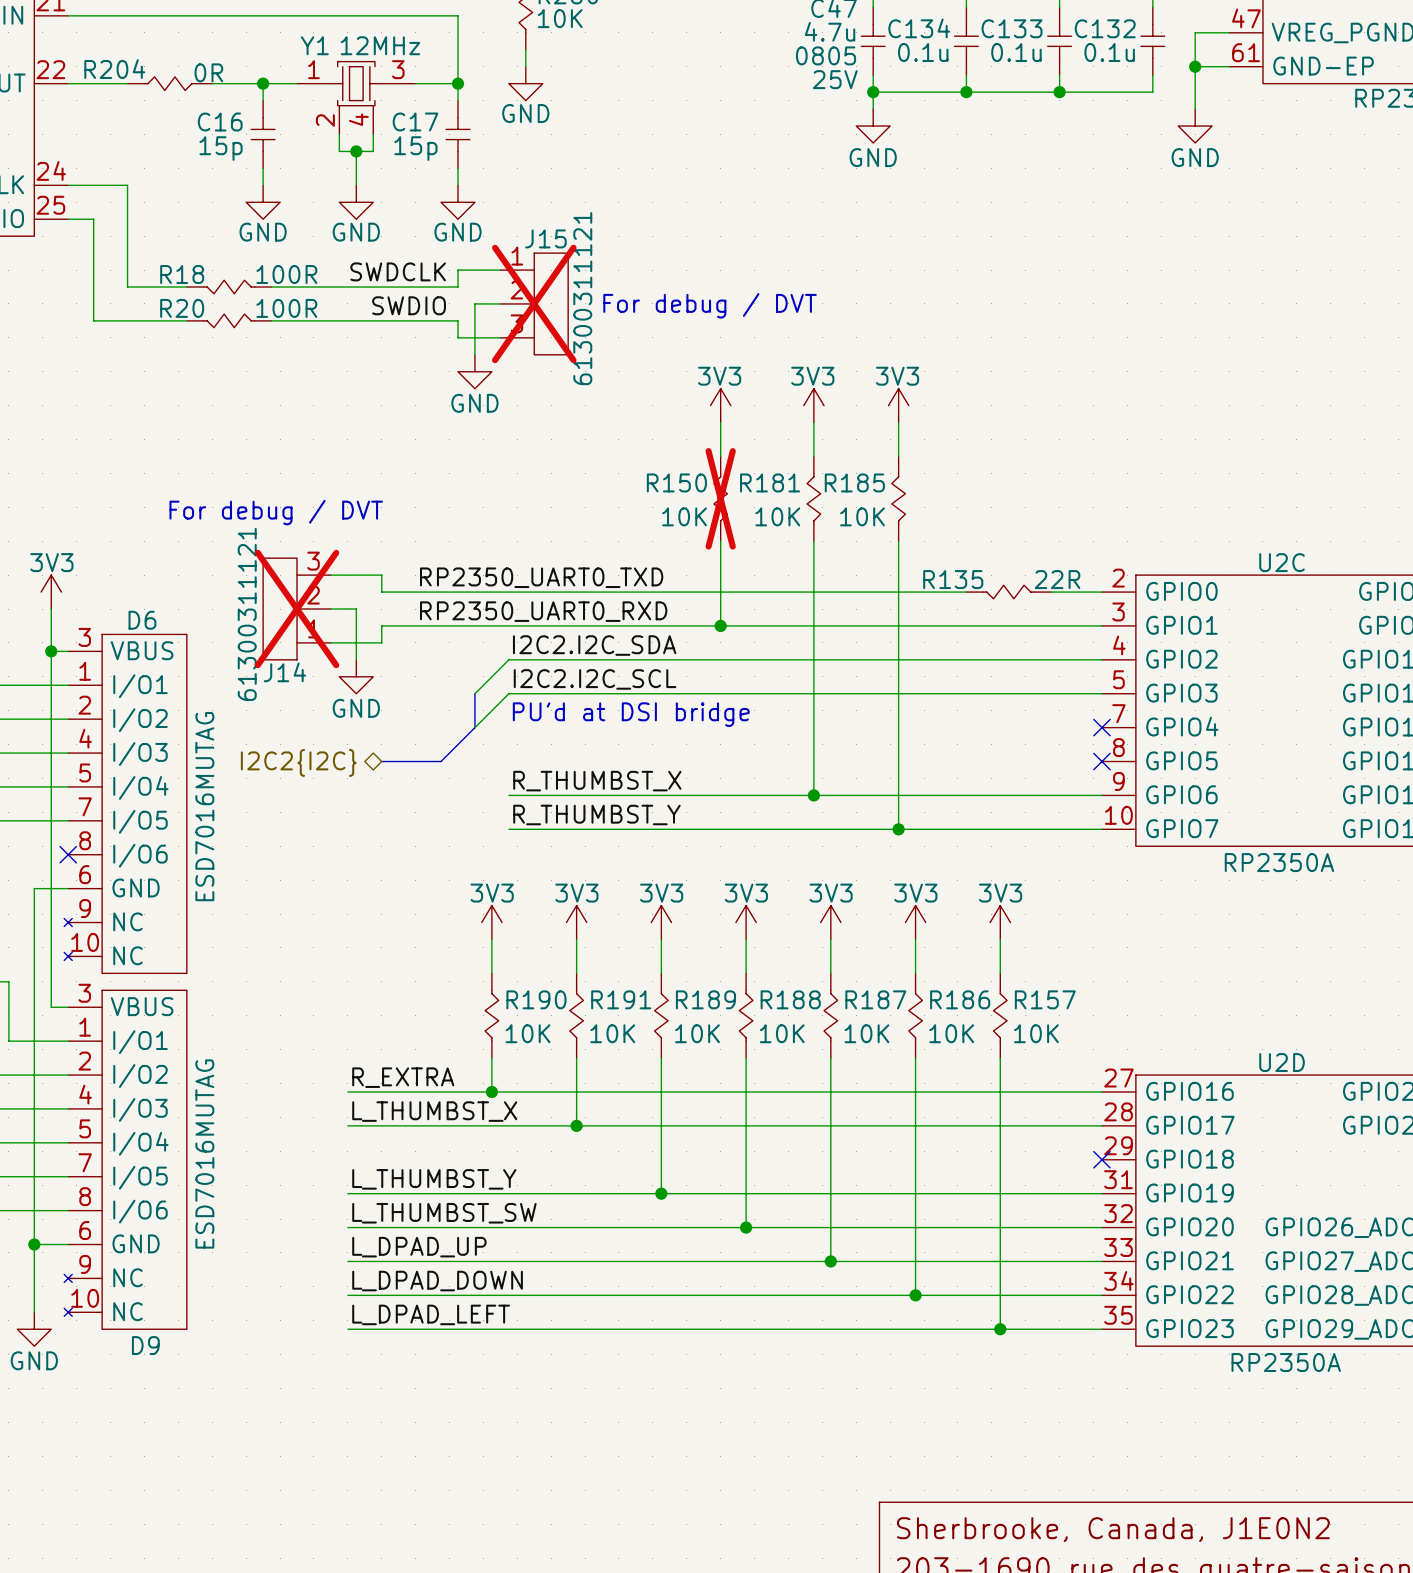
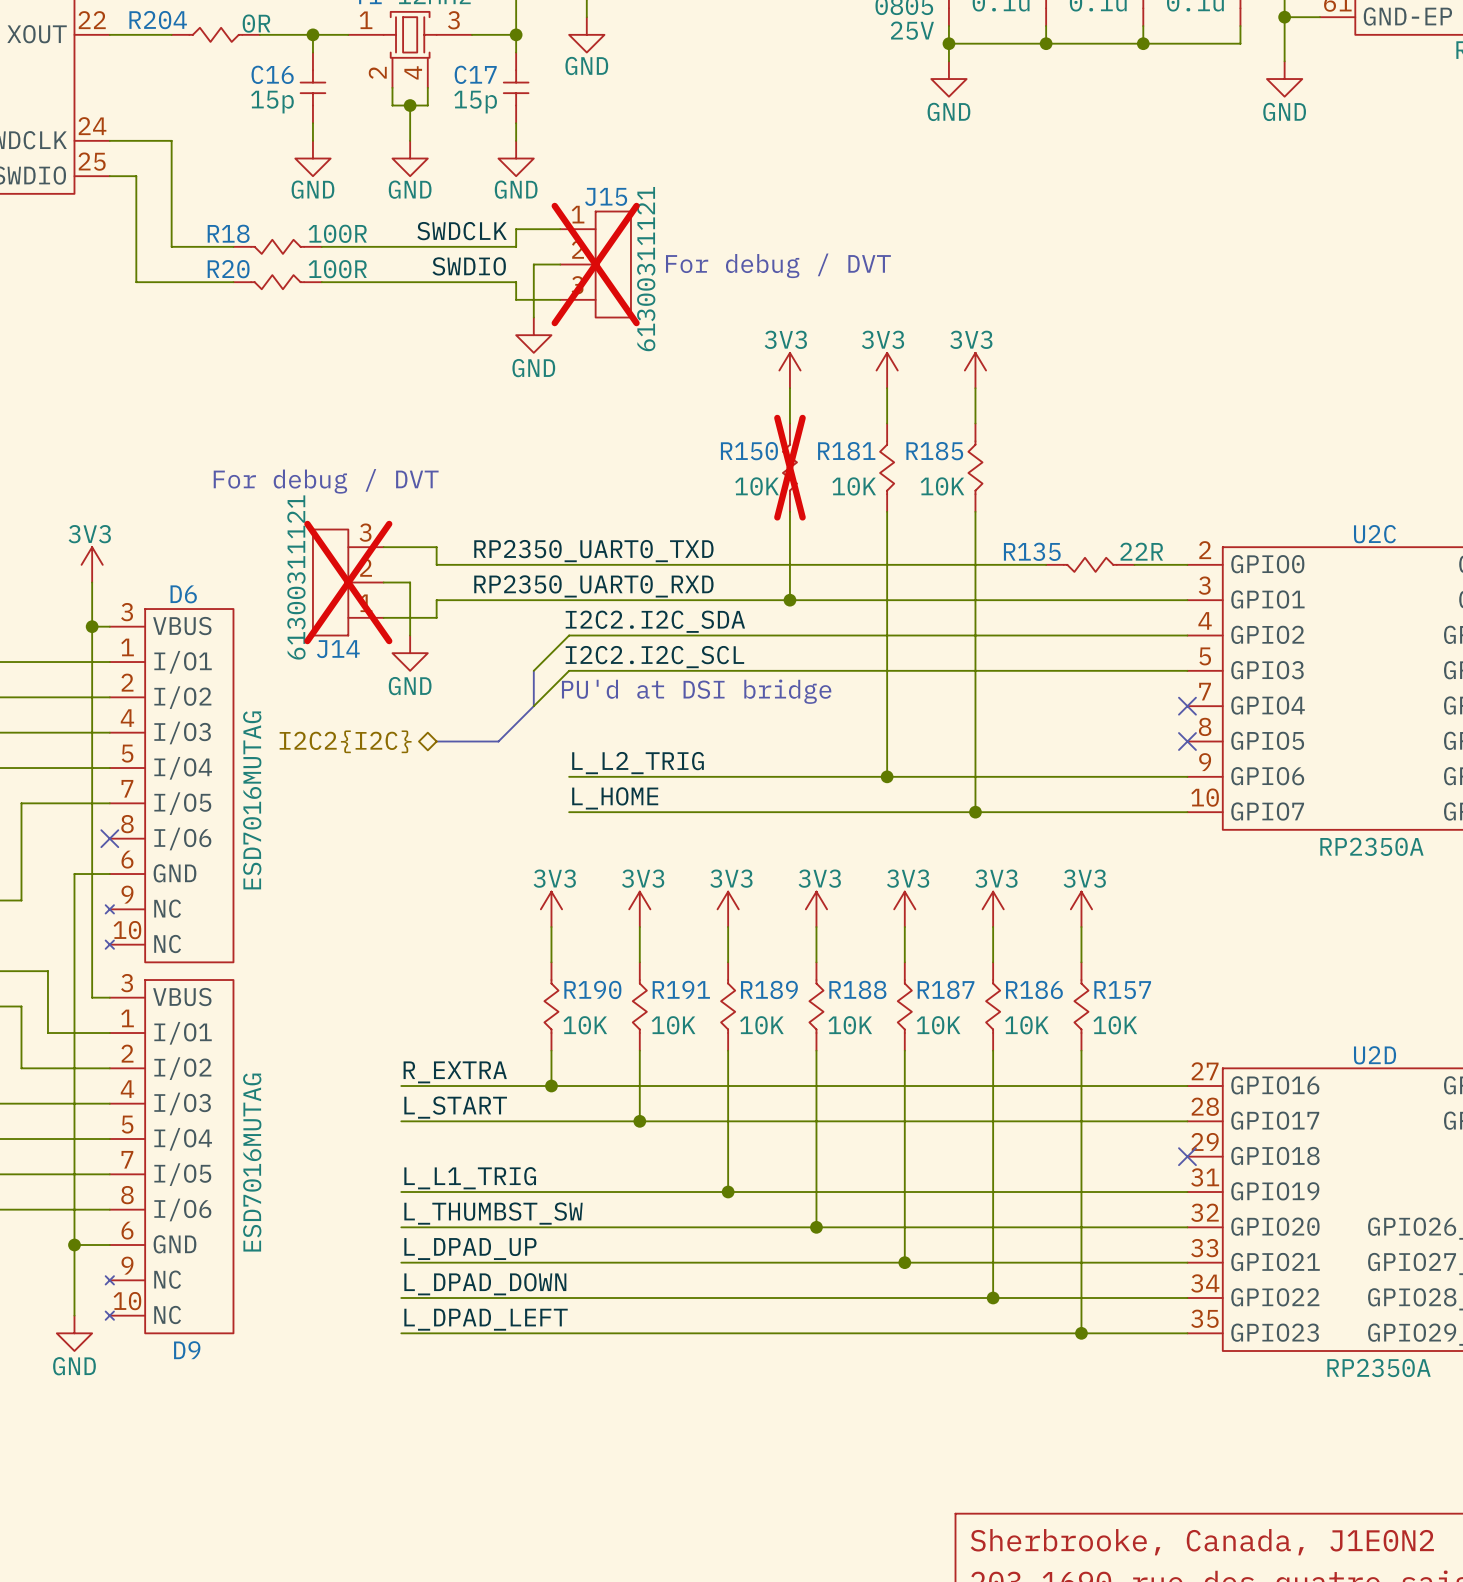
label: R_THUMBST_X (597, 781) -> L_L2_TRIG (638, 763)
label: R_THUMBST_Y (596, 815) -> L_HOME (615, 798)
label: L_THUMBST_X (434, 1111) -> L_START (455, 1107)
label: L_THUMBST_Y (434, 1179) -> L_L1_TRIG (470, 1178)

